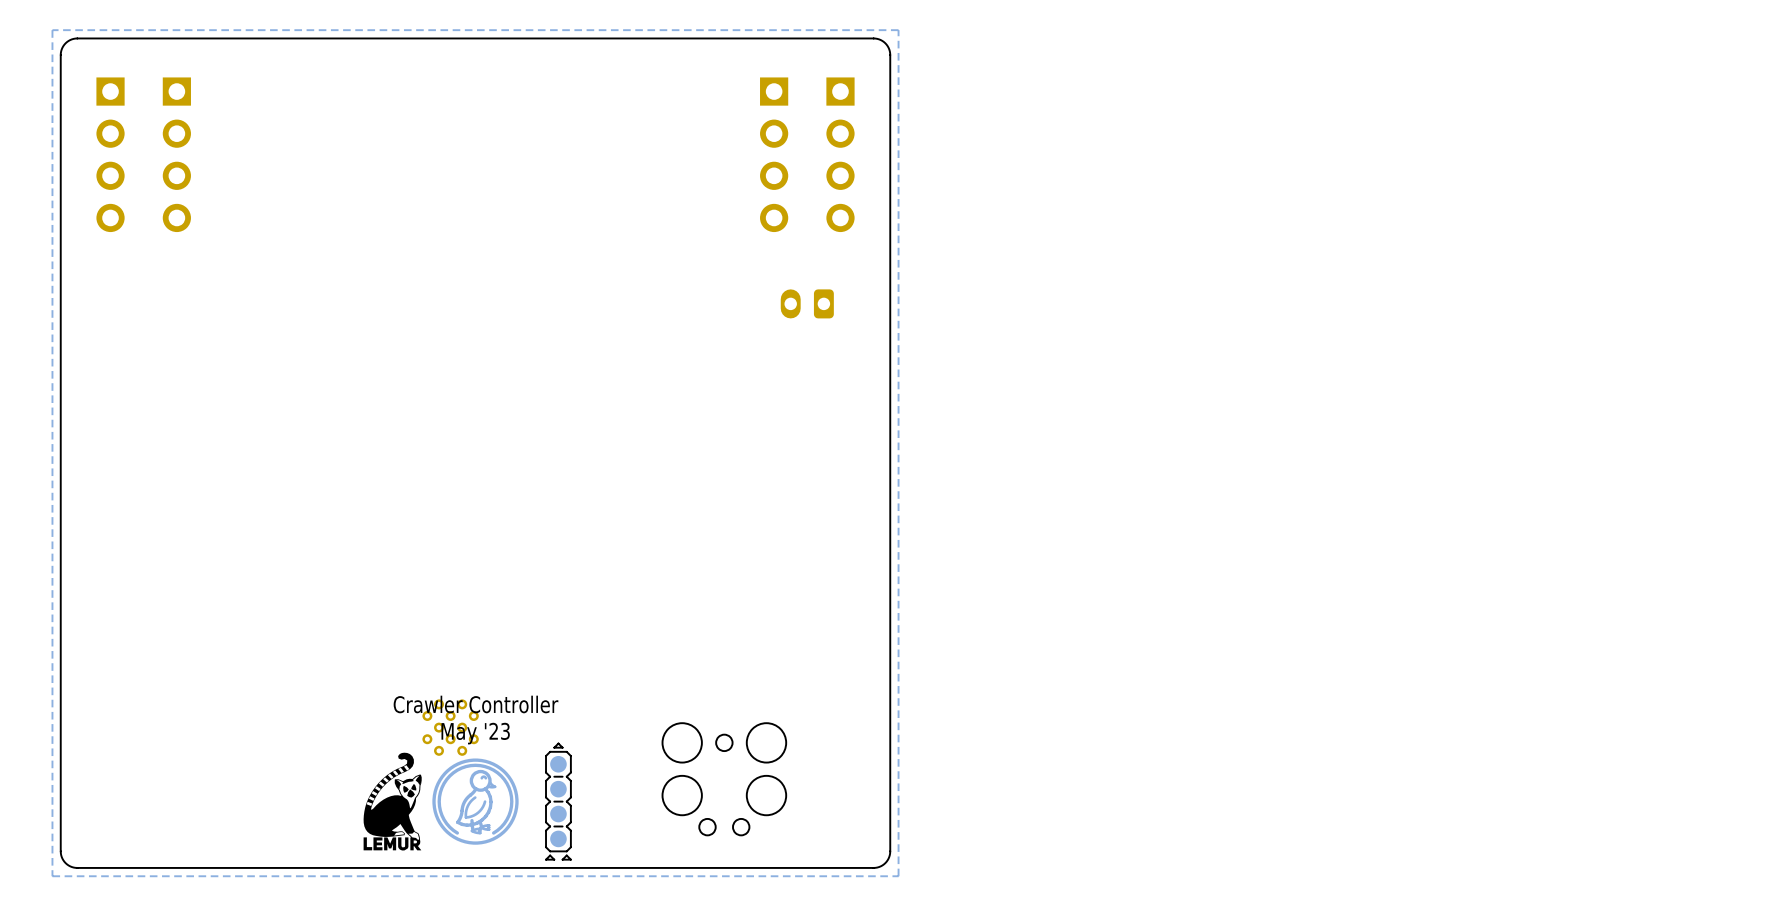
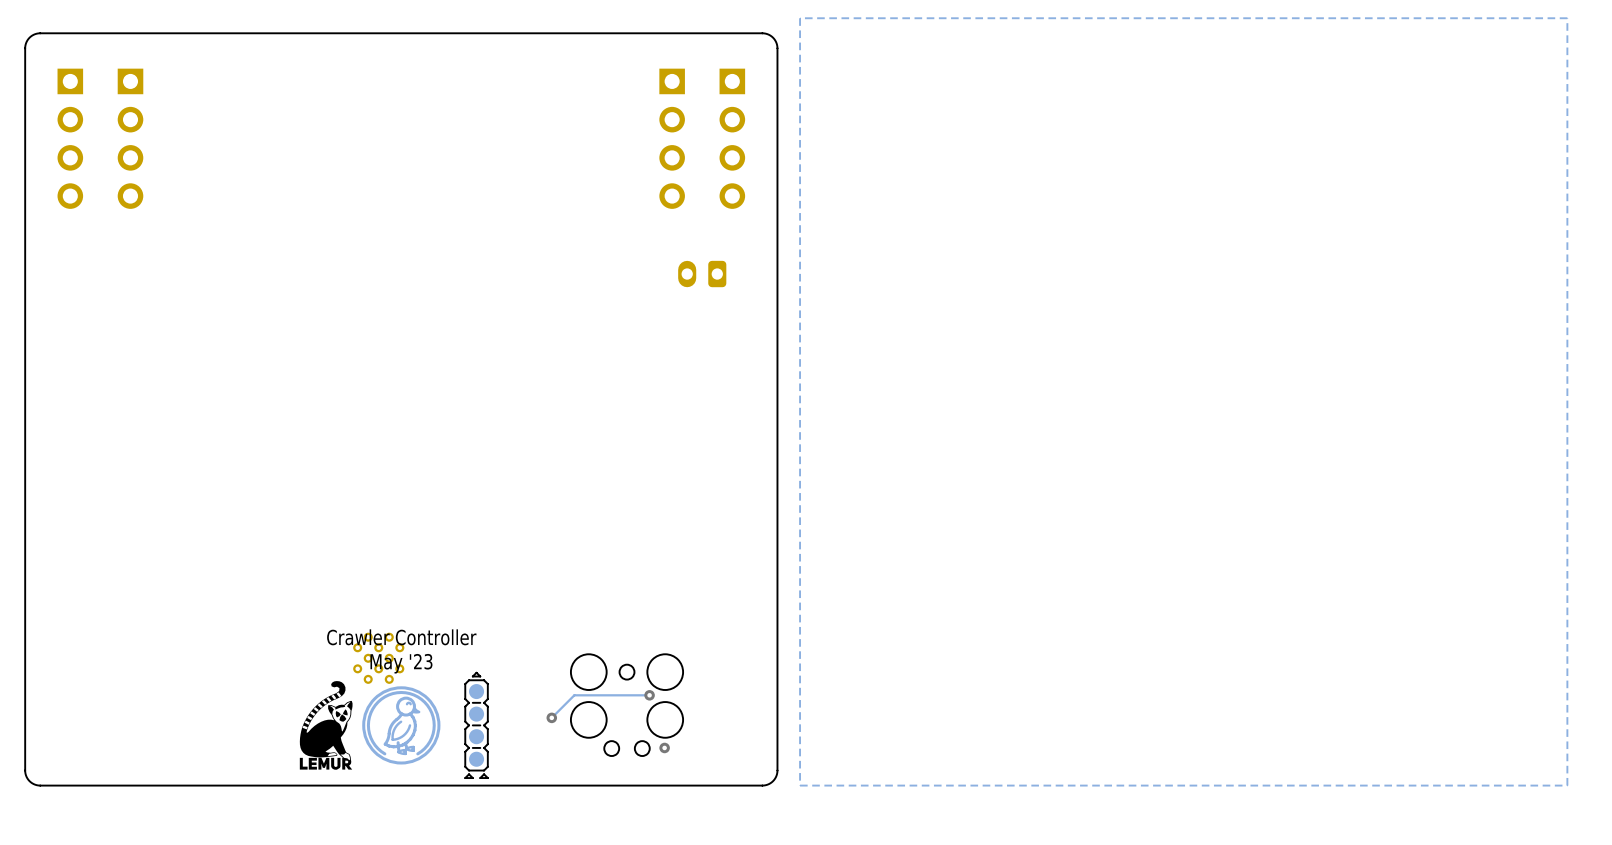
zone outline: none -> (1567, 18) (1567, 785) (800, 785) (800, 18) (1567, 18)
zone outline: (898, 30) (898, 876) (52, 876) (52, 30) (898, 30) -> none
track: none -> (649, 695) (574, 695) (551, 717)
via: none -> (649, 695)
via: none -> (551, 717)
via: none -> (664, 747)

